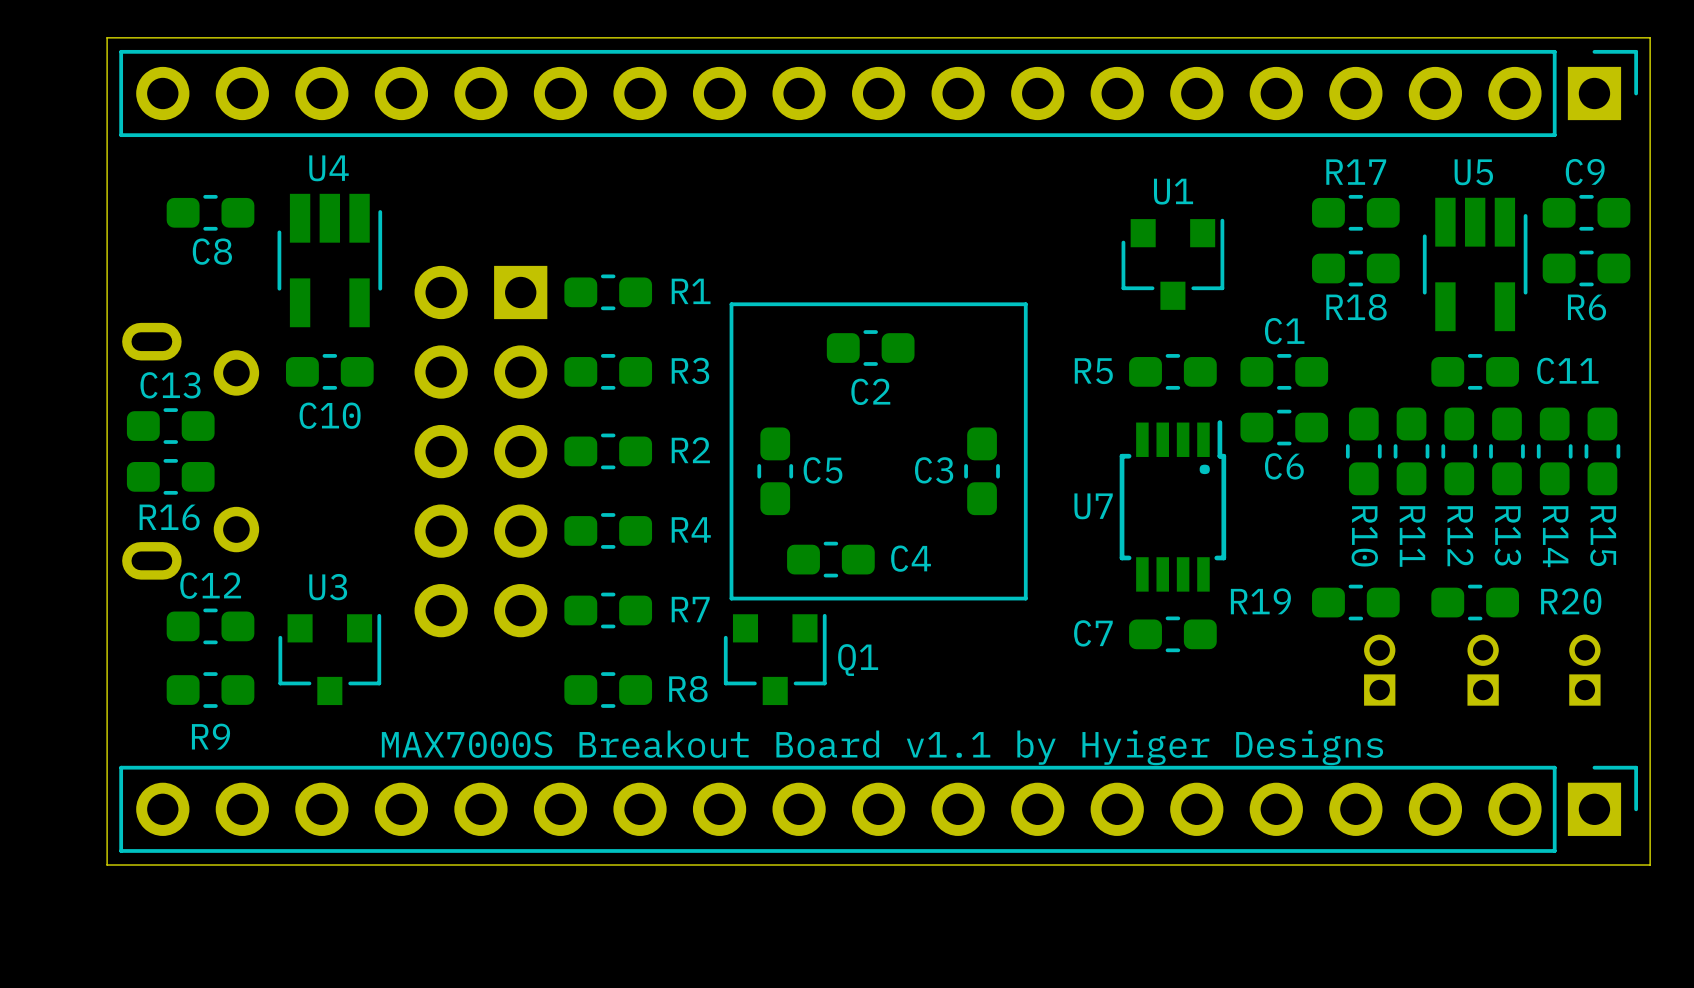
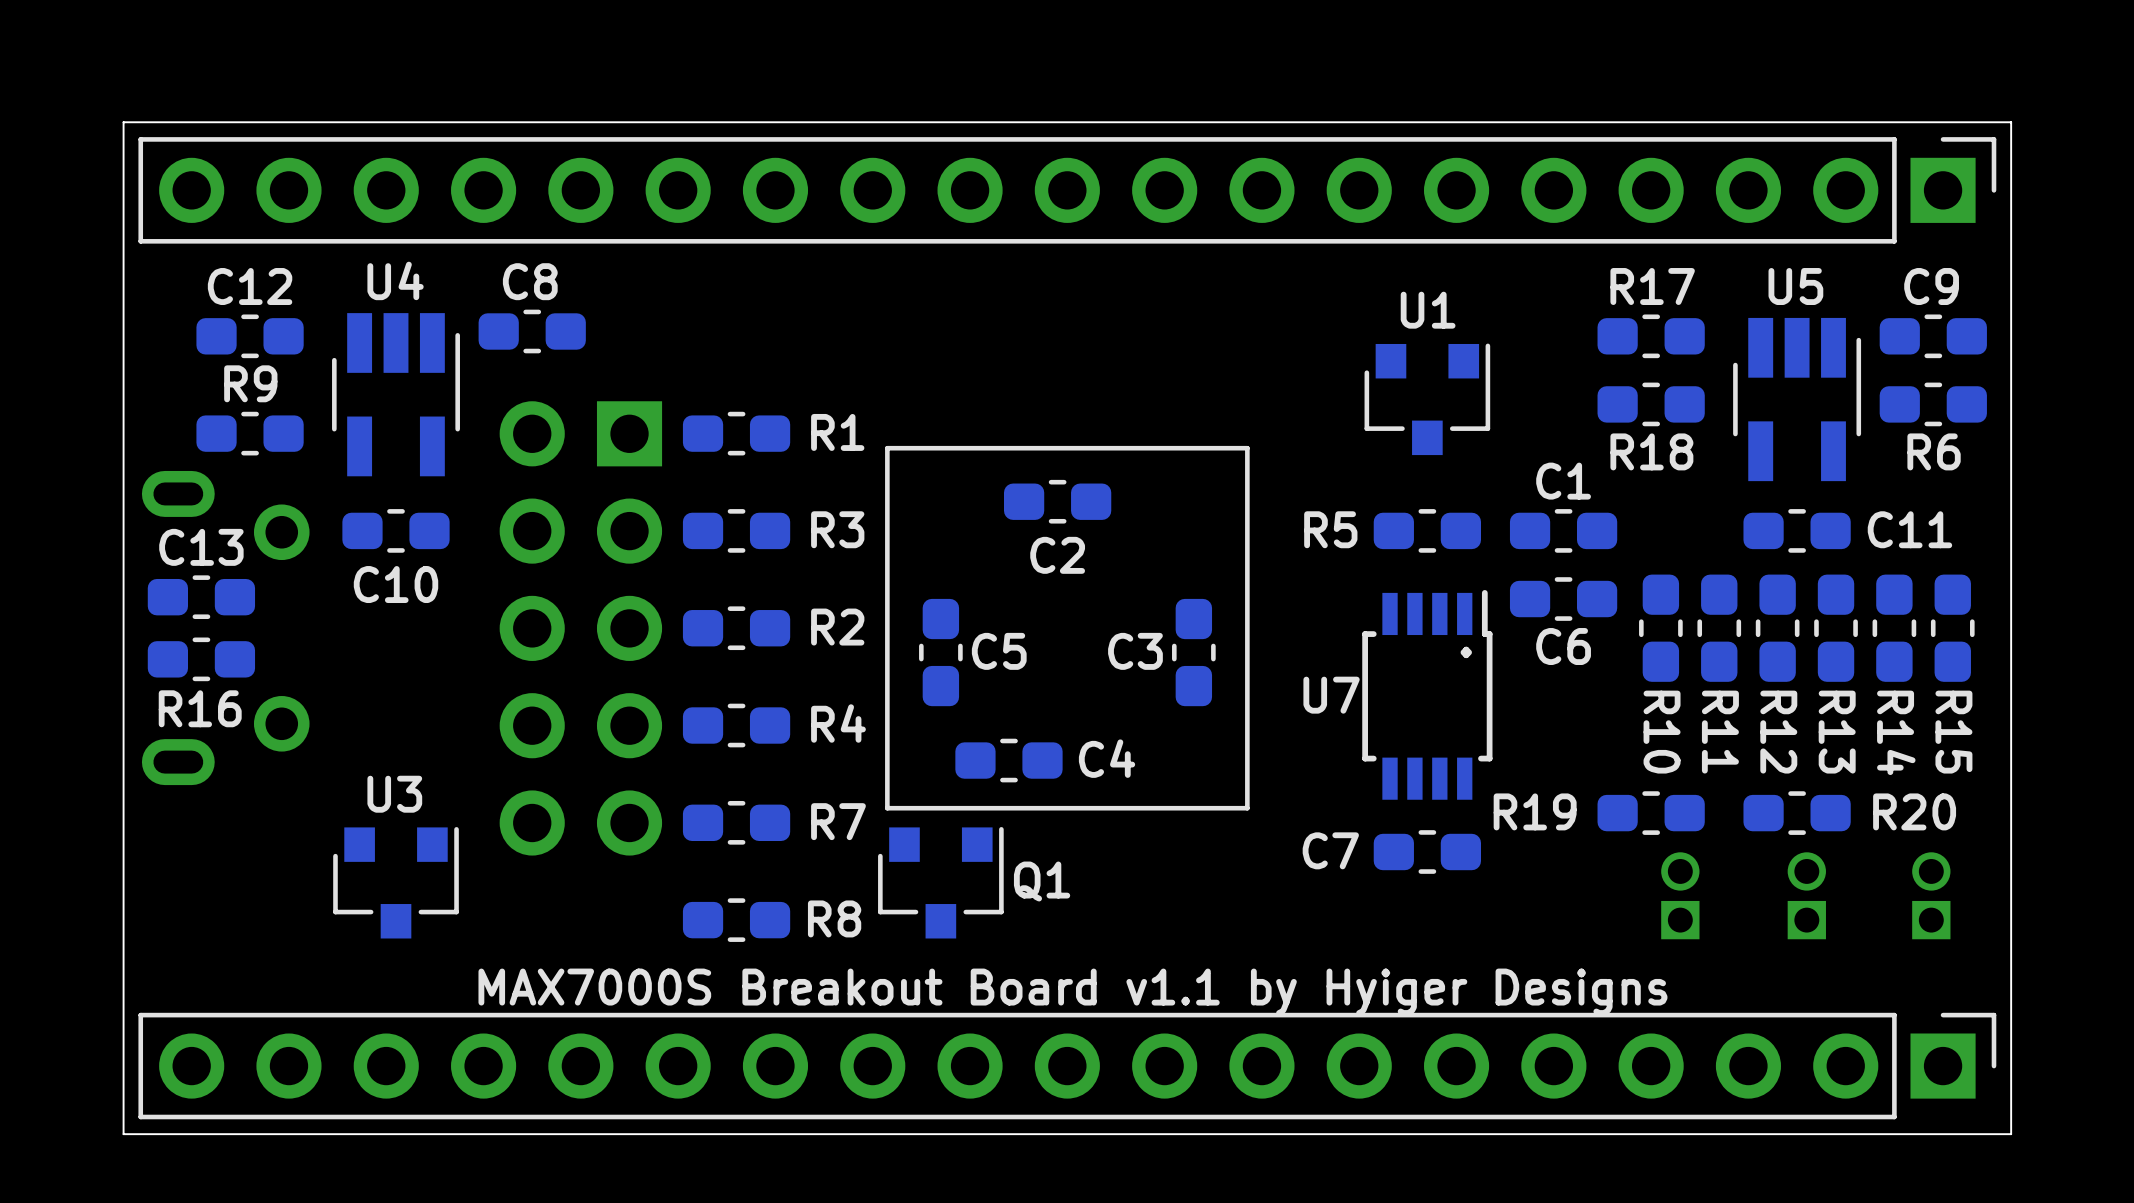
C8: none -> (532, 331)
C8 name: C8 (212, 251) -> C12 (250, 286)
R9 position: (210, 626) -> (250, 433)
C12: (210, 690) -> none
R9 name position: R9 (210, 736) -> R9 (250, 383)

